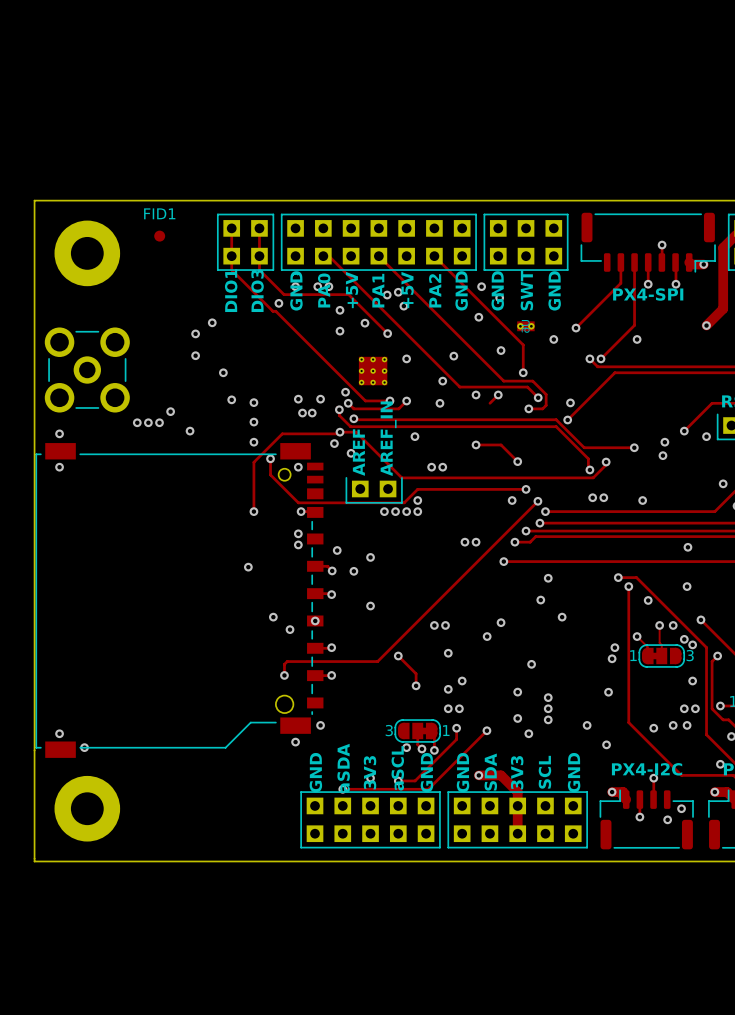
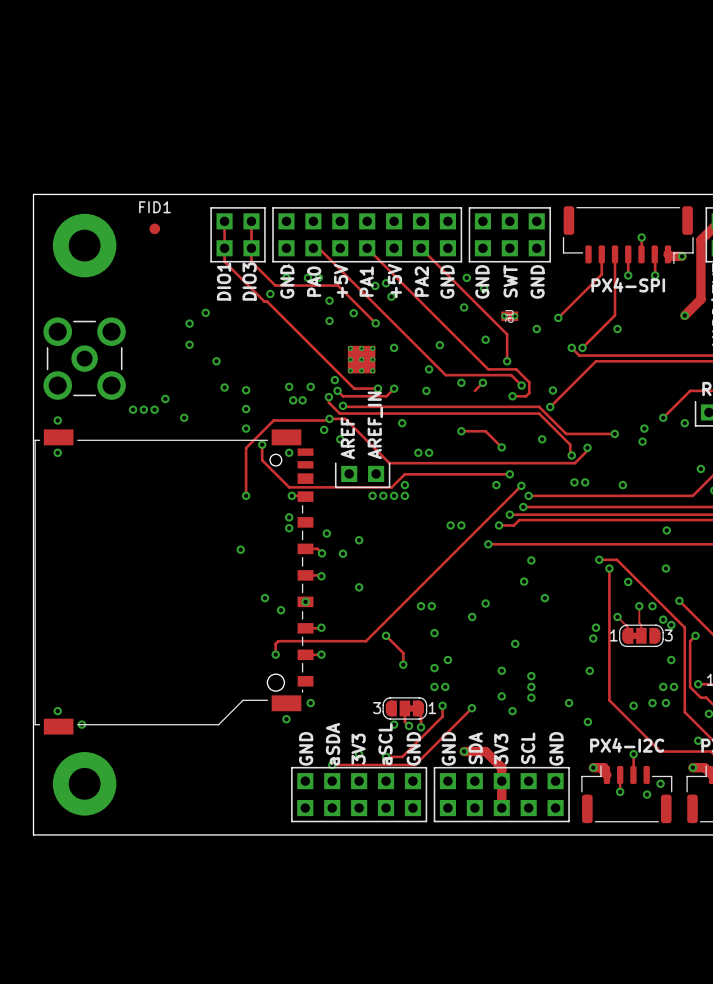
via: none -> (542, 439)

